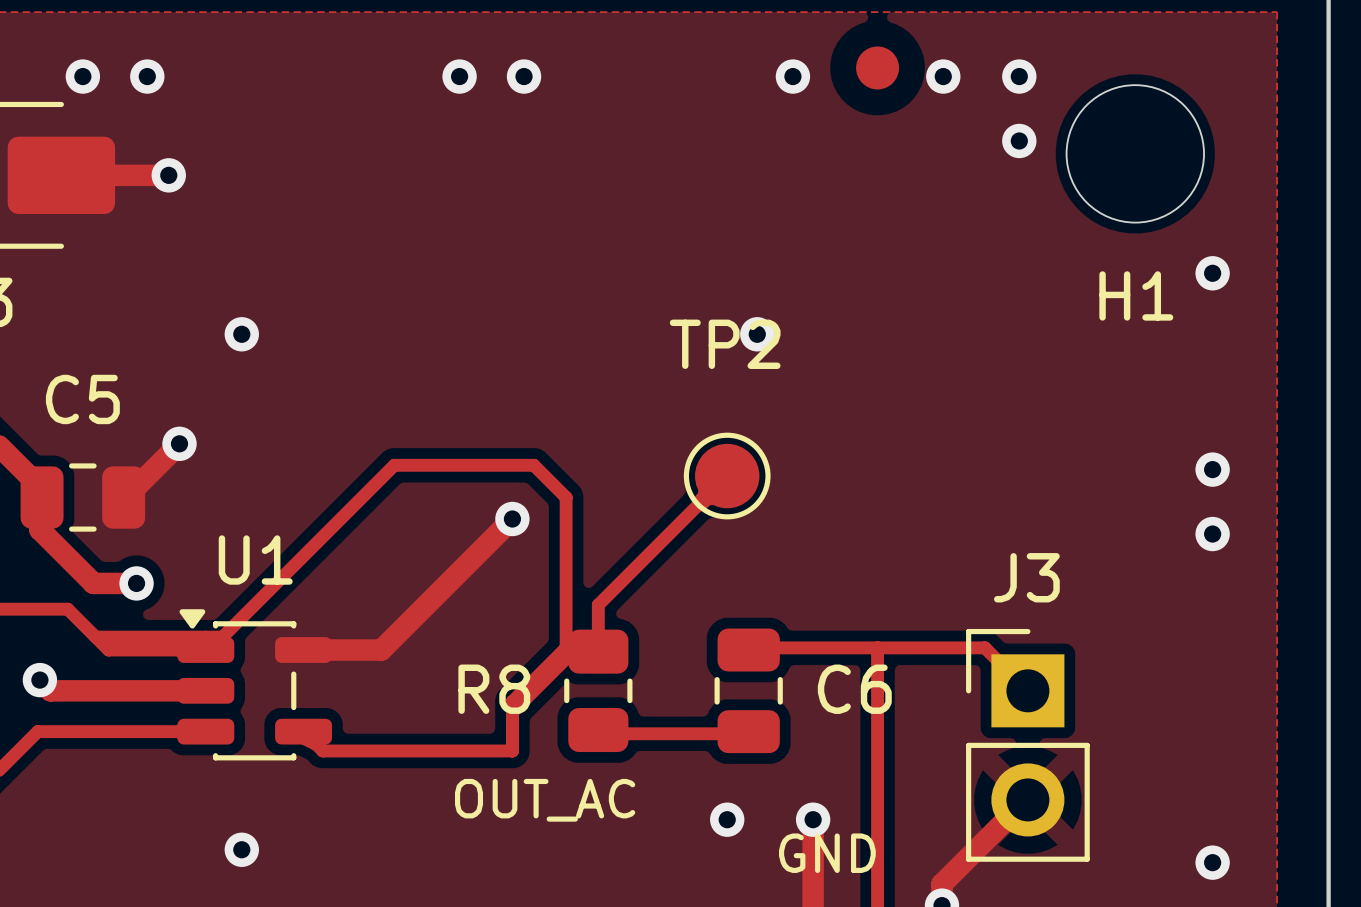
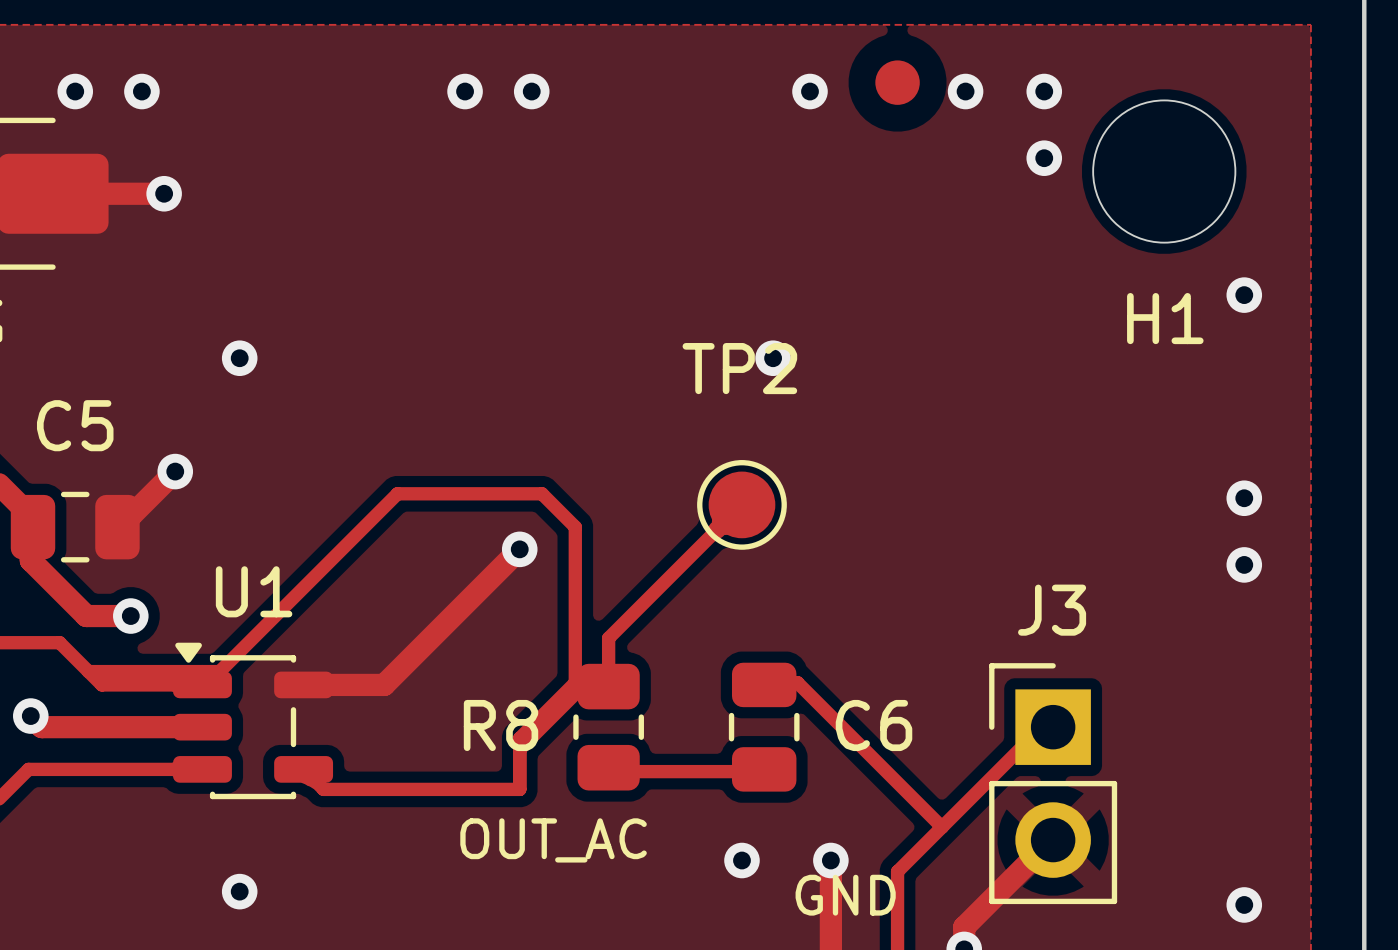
track: (780, 647) (984, 647) (1027, 690) -> (797, 682) (942, 827)
track: (877, 647) (877, 830) -> (1053, 727) (1042, 727) (897, 871)

